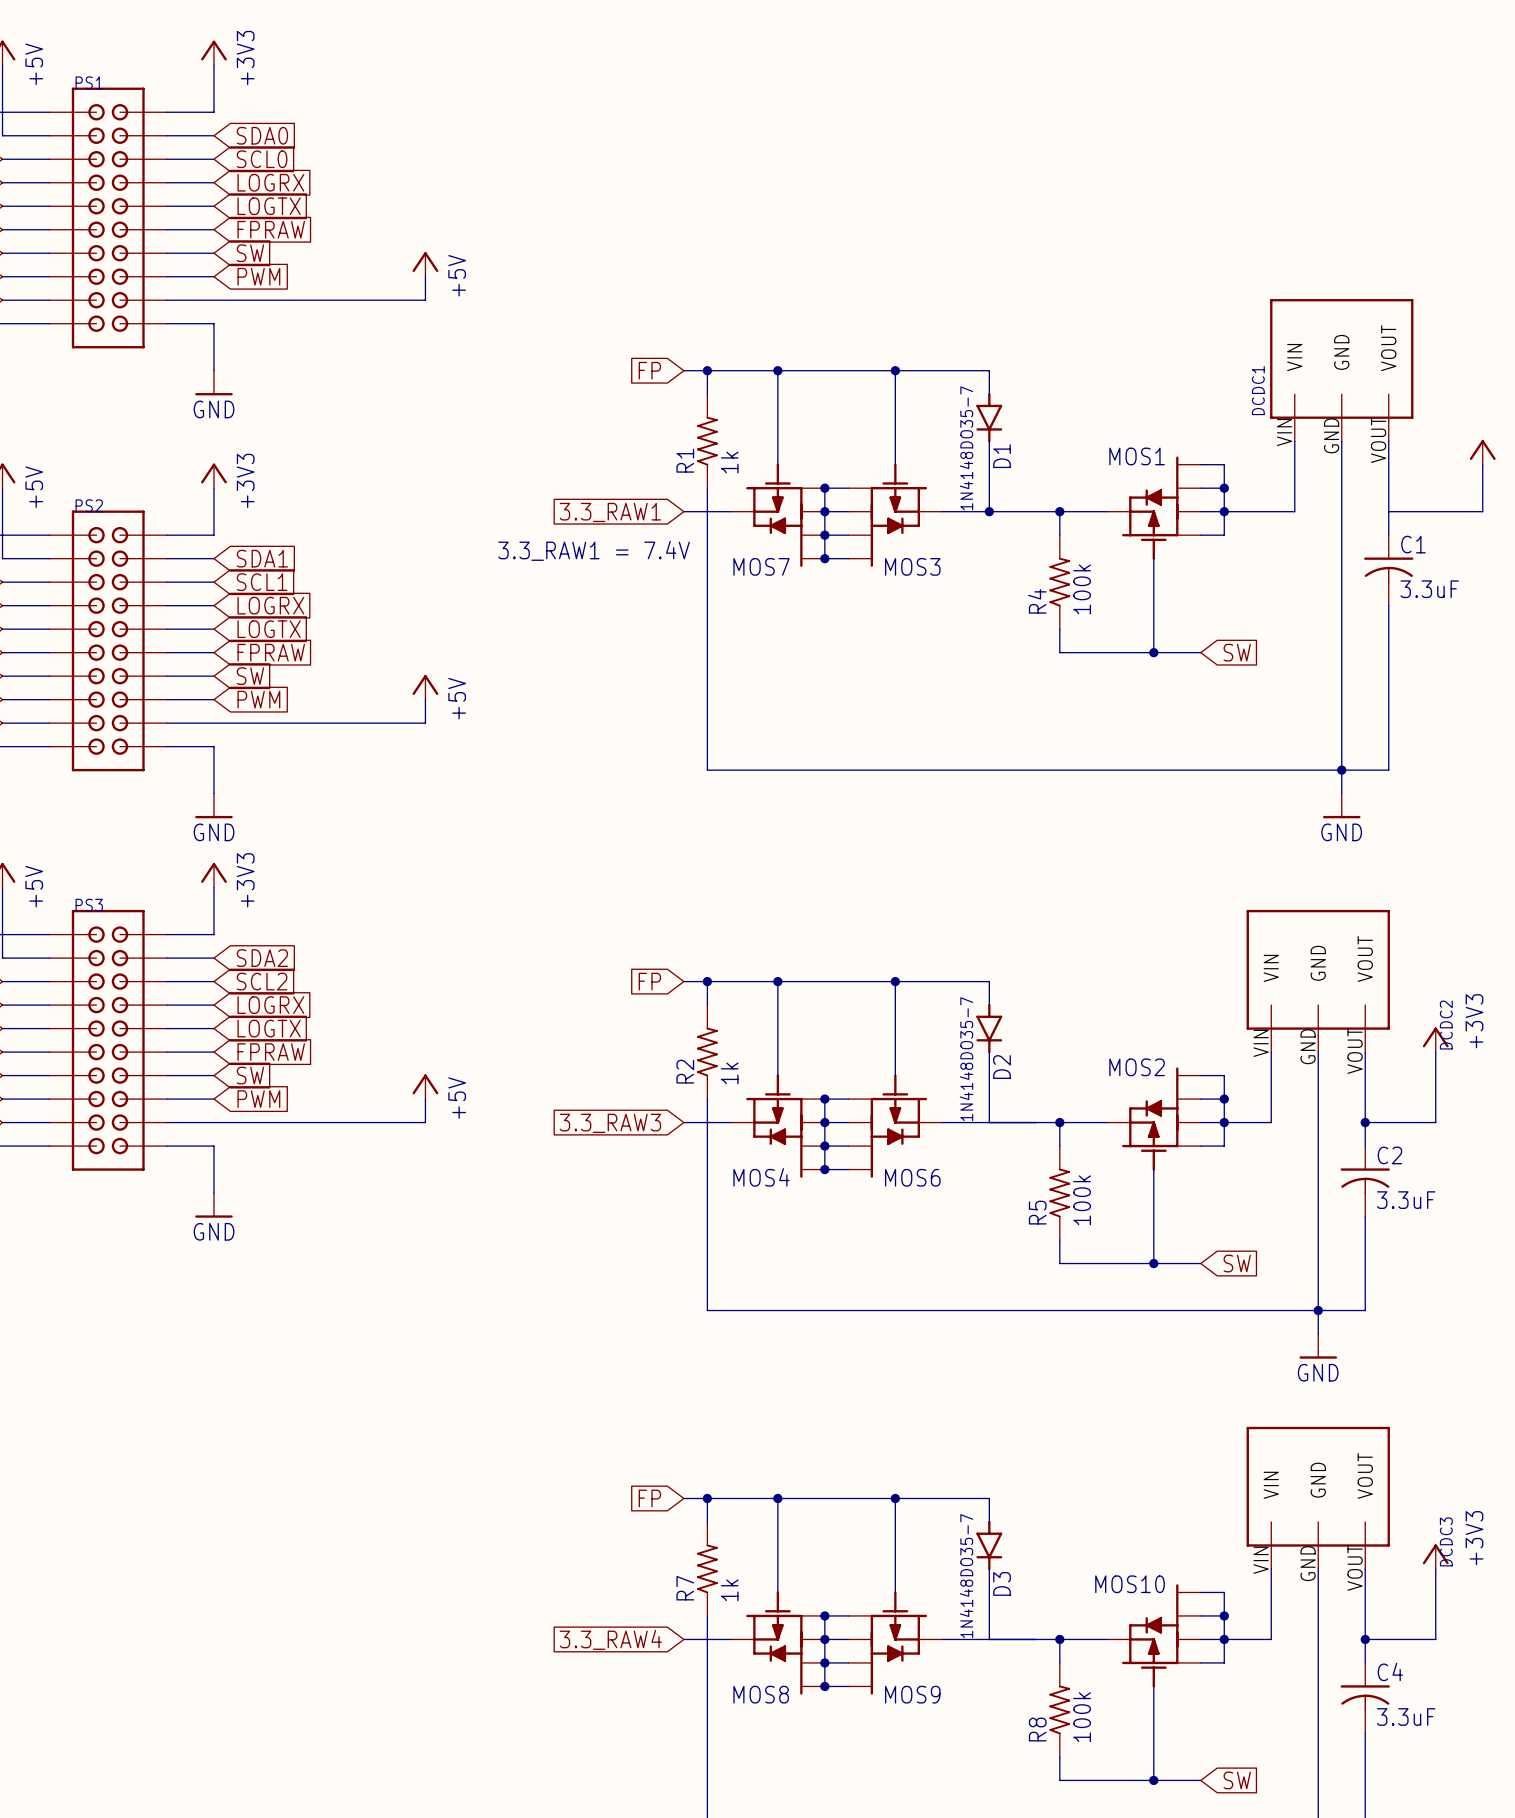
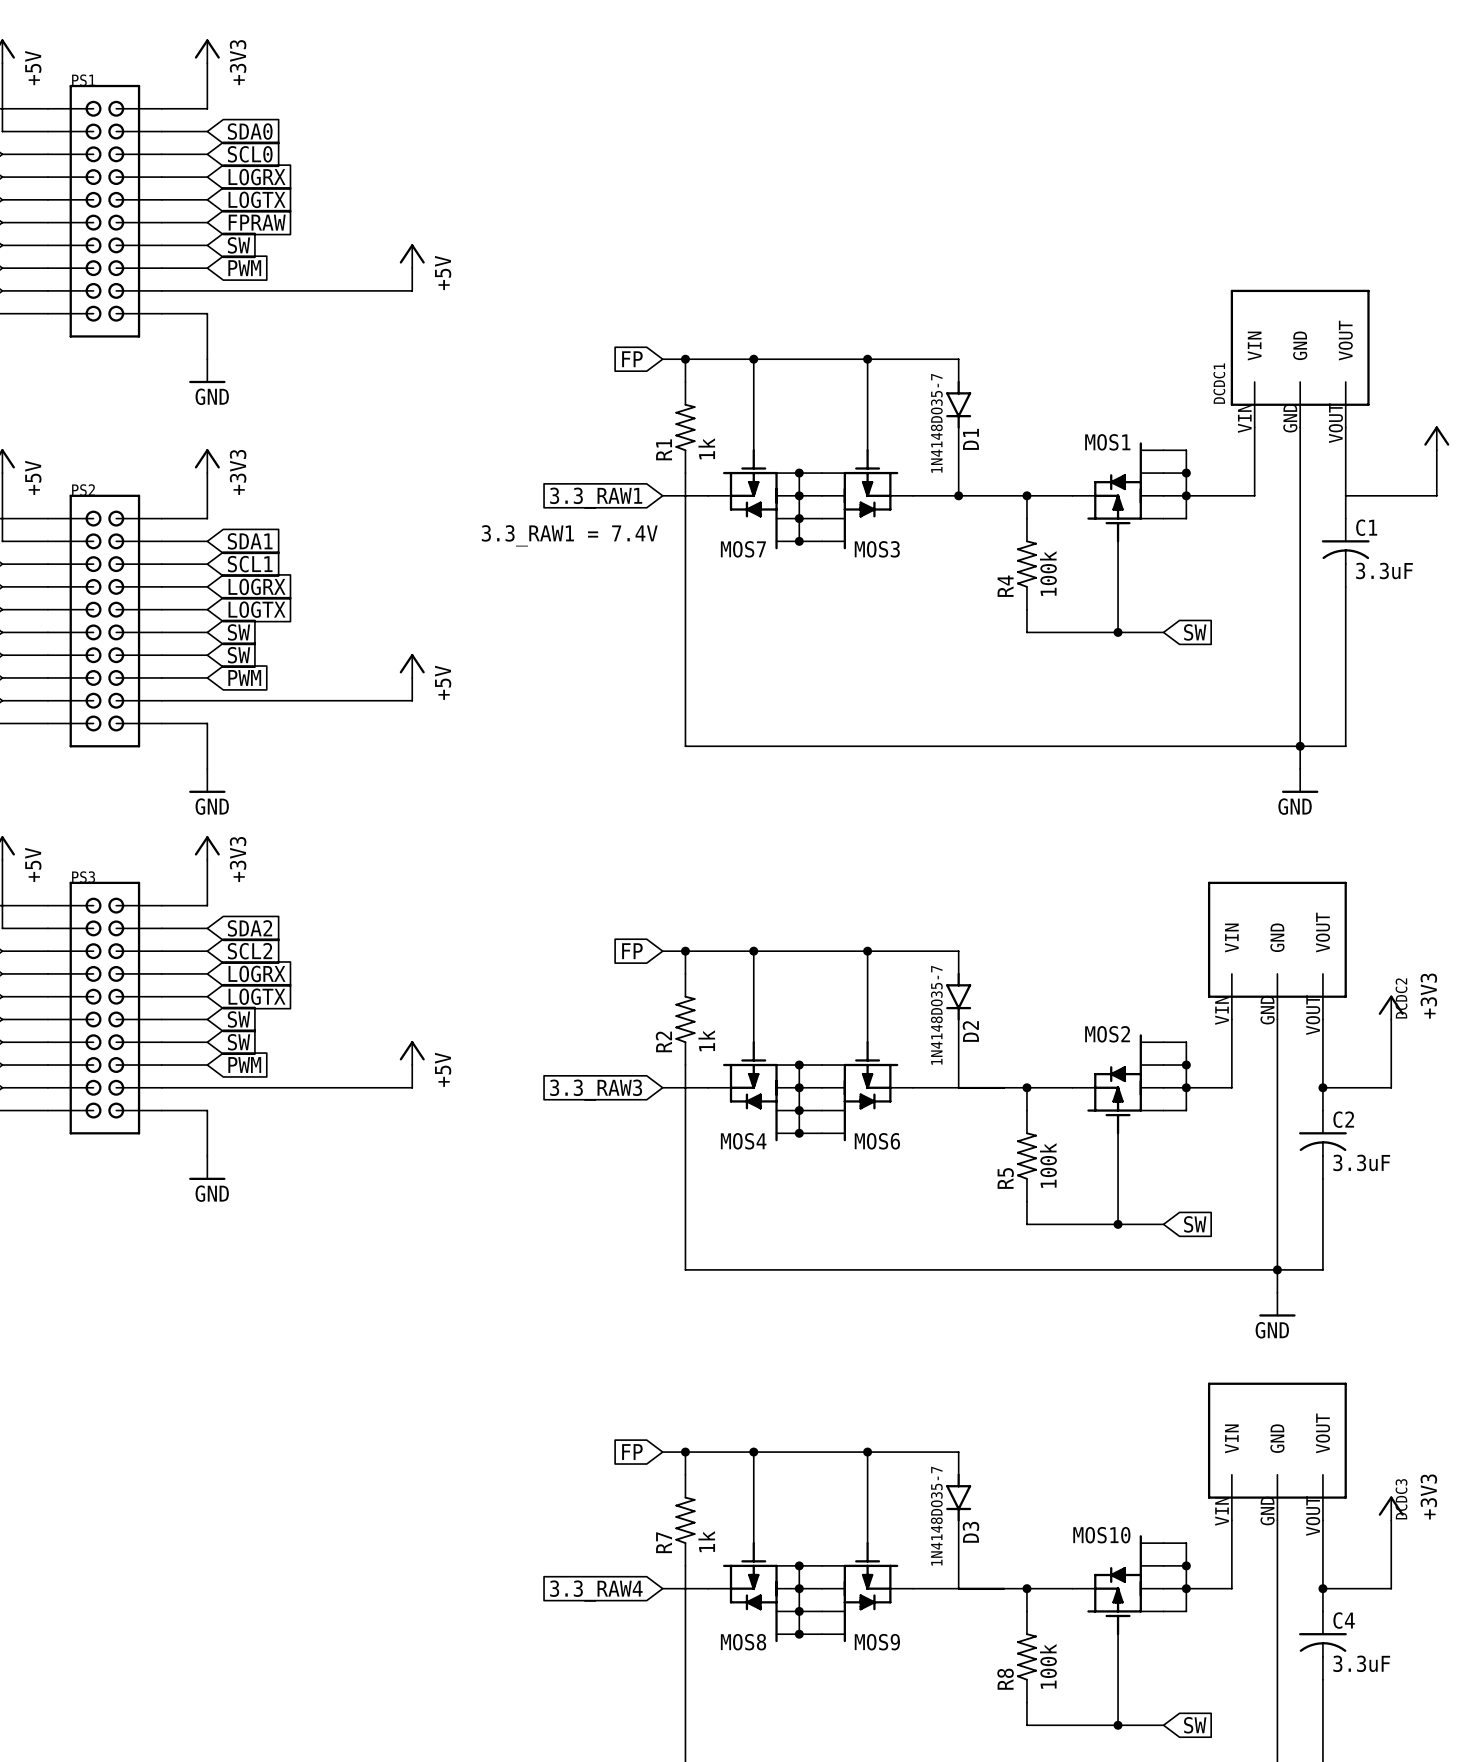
global label: FPRAW (271, 652) -> SW (238, 632)
global label: FPRAW (271, 1052) -> SW (238, 1019)

